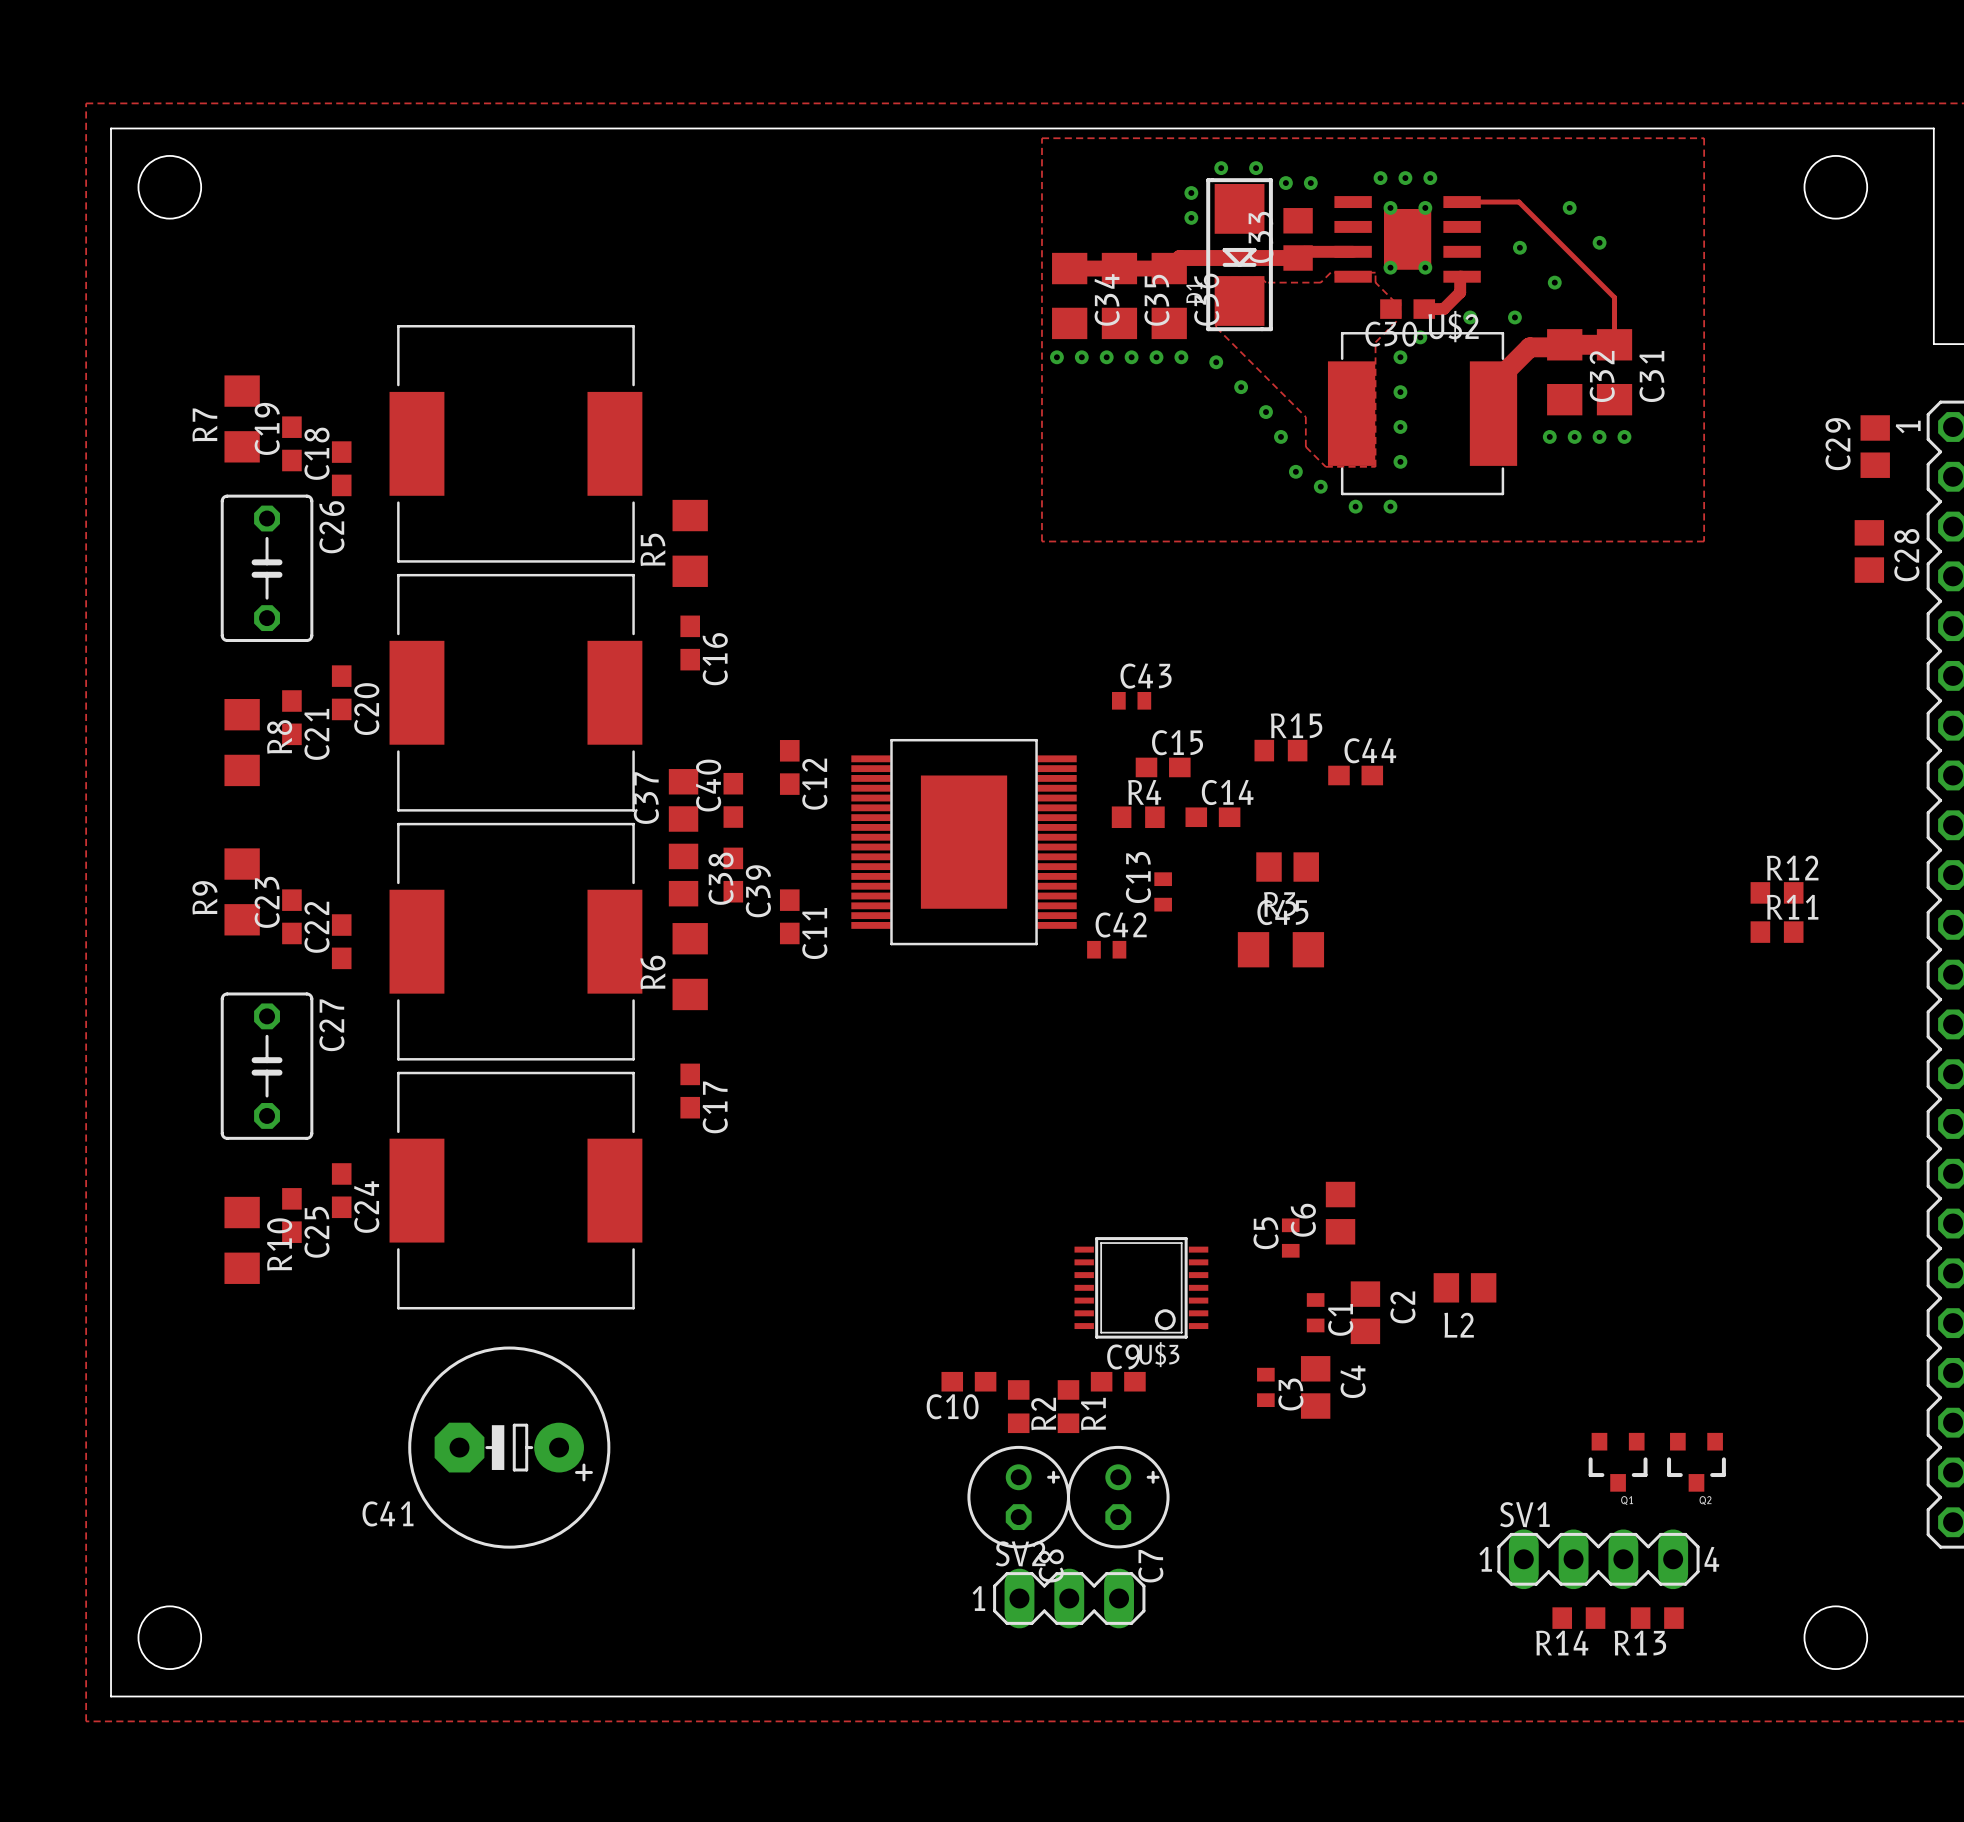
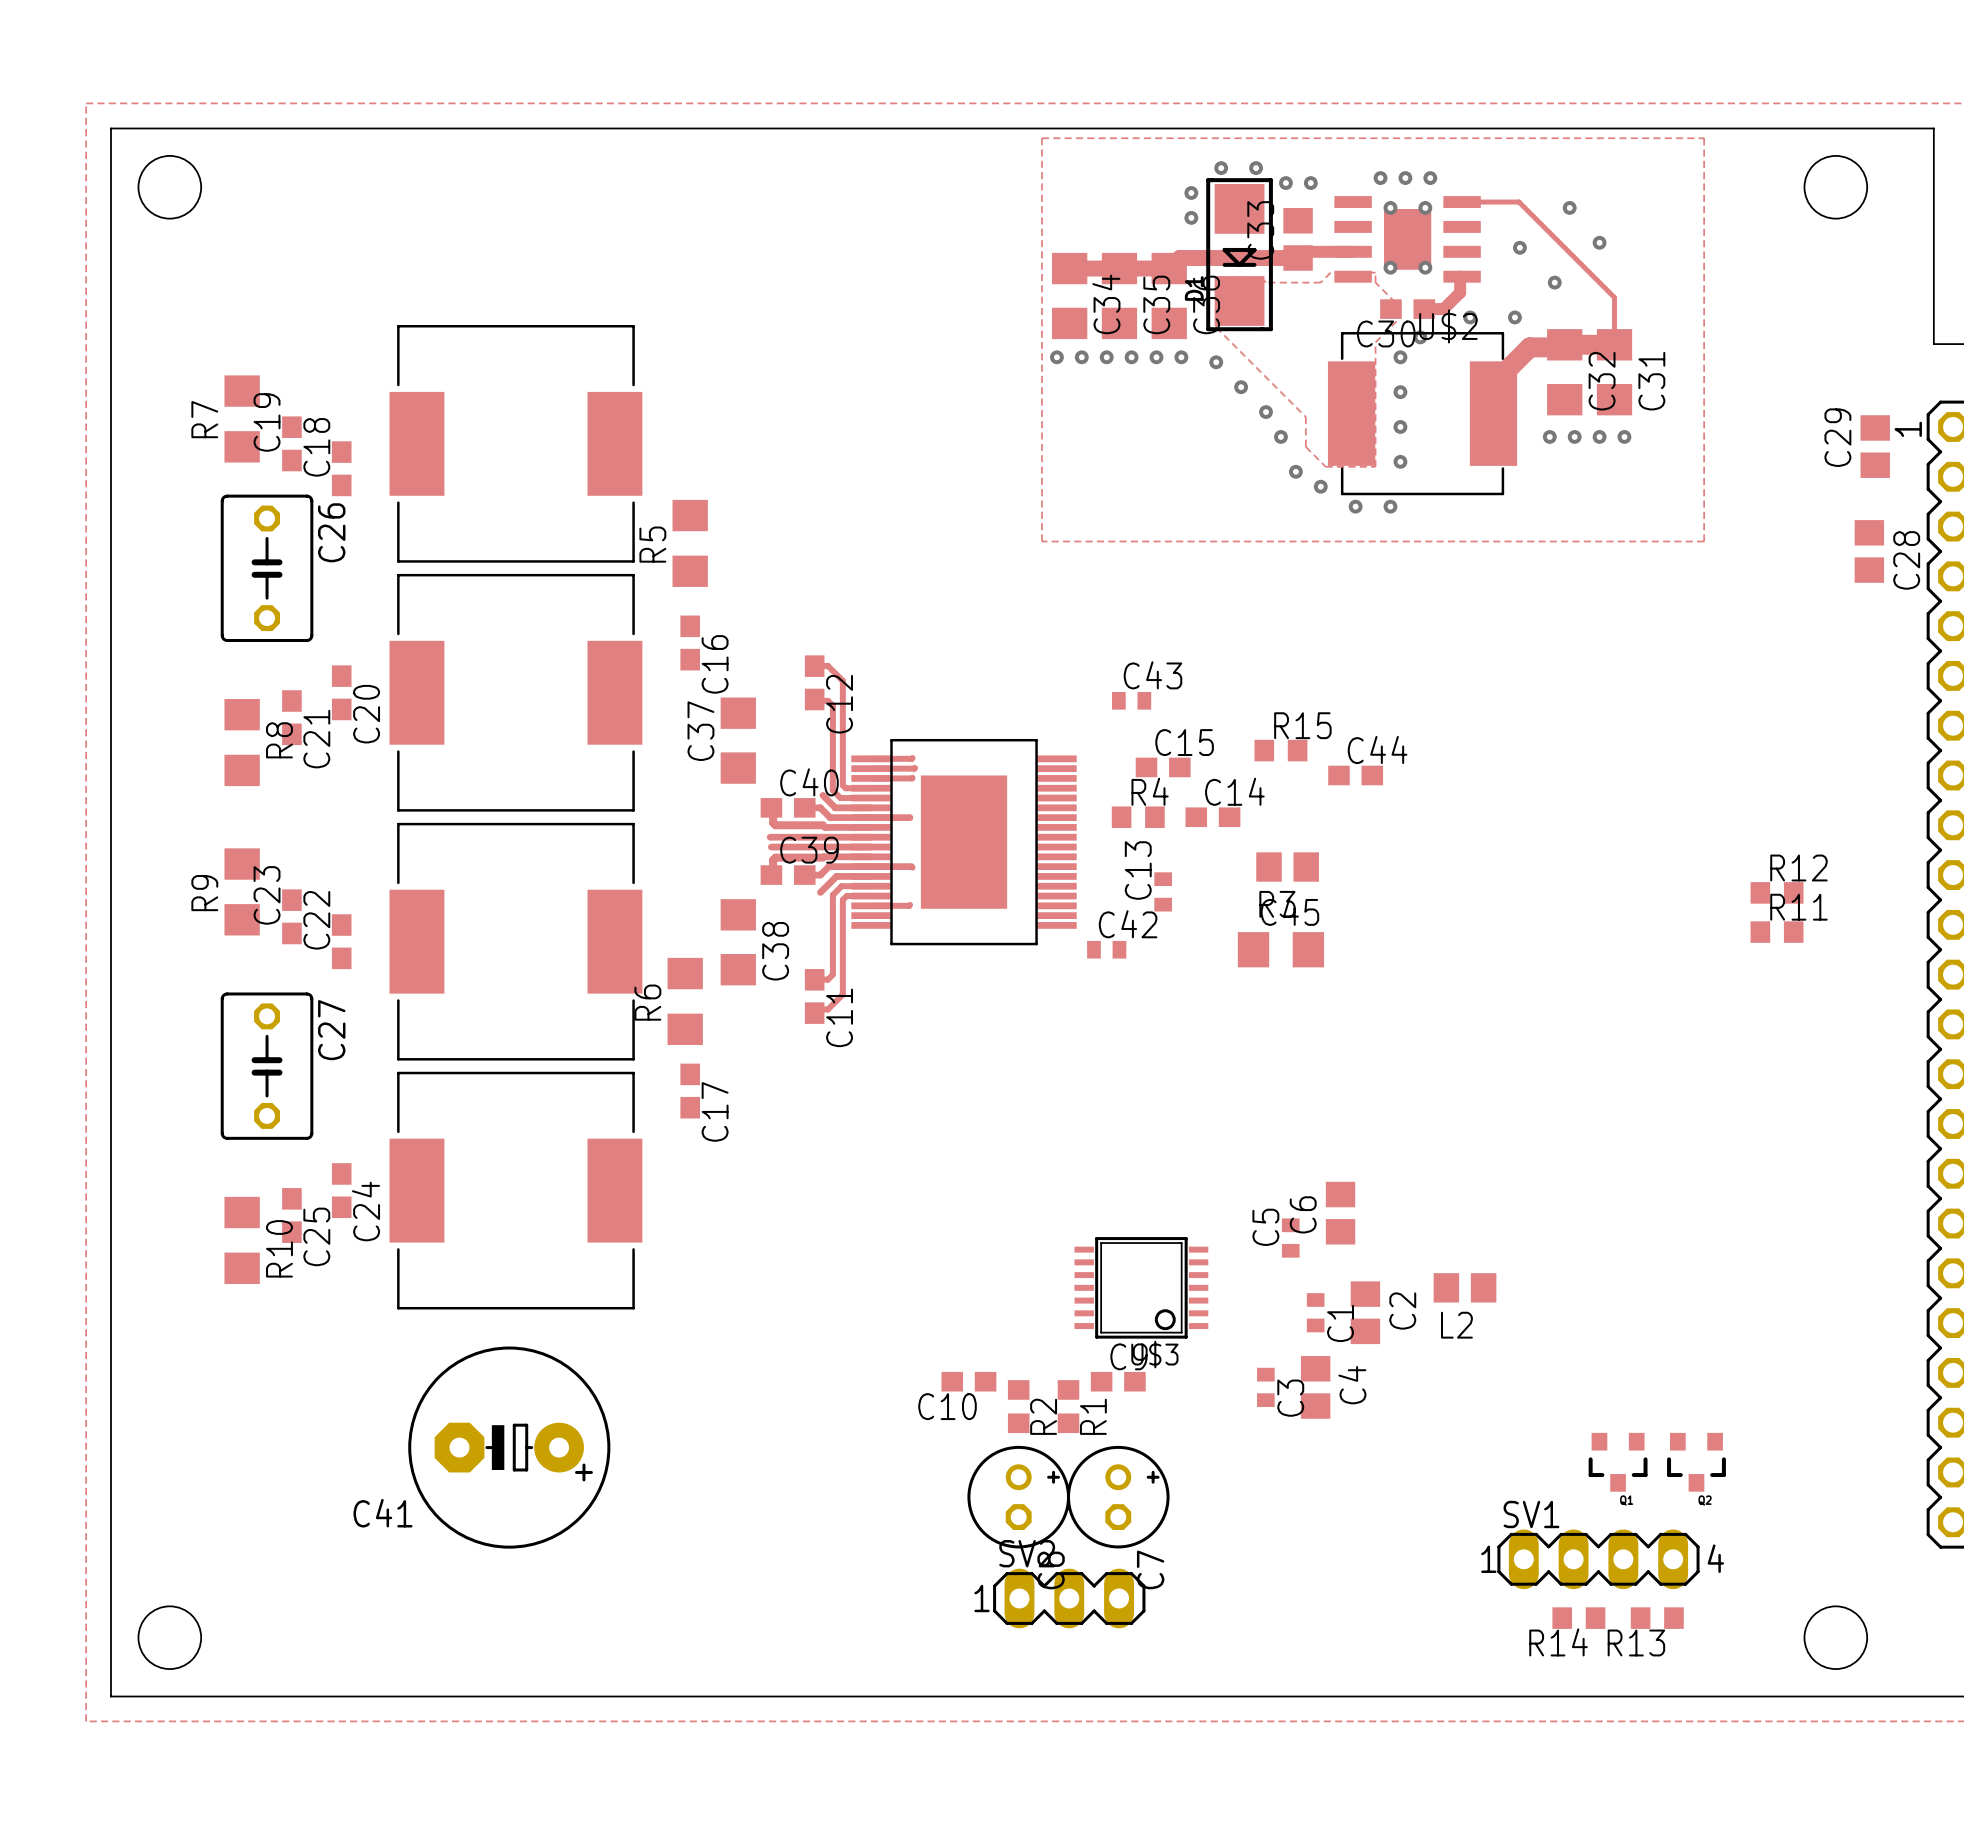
top track: none -> (814, 665) (827, 665) (842, 680) (842, 785) (845, 788) (870, 788)
top track: none -> (814, 699) (827, 700) (832, 705) (832, 790) (840, 798) (870, 798)
top track: none -> (912, 758) (870, 758)
C12 position: (789, 767) -> (814, 682)
top track: none -> (915, 768) (870, 768)
C37 footprint: [668, 769, 699, 832] -> [720, 697, 756, 784]
top track: none -> (912, 777) (870, 778)
top track: none -> (822, 795) (835, 807) (870, 807)
C40 rotation: 0° (733, 800) -> 90° clockwise (788, 807)
C40 position: (733, 800) -> (788, 807)
top track: none -> (771, 807) (773, 809) (773, 822) (775, 825) (870, 827)
top track: none -> (804, 807) (820, 807) (830, 817) (909, 817)
top track: none -> (770, 837) (870, 837)
C38 footprint: [668, 843, 699, 907] -> [720, 899, 756, 986]
top track: none -> (771, 847) (870, 847)
top track: none -> (870, 856) (775, 857) (773, 860) (773, 873) (771, 875)
top track: none -> (912, 867) (828, 866) (820, 875) (804, 875)
C39 rotation: 0° (733, 875) -> 90° clockwise (788, 875)
C39 position: (733, 875) -> (788, 875)
top track: none -> (870, 876) (836, 876) (820, 892)
top track: none -> (870, 886) (841, 886) (832, 894) (832, 974) (827, 979) (814, 979)
C39 name position: C39 (758, 891) -> C39 (809, 850)
top track: none -> (870, 896) (846, 896) (842, 899) (842, 994) (827, 1009) (818, 1009) (814, 1013)
top track: none -> (910, 904) (870, 905)
C11 position: (789, 916) -> (814, 996)
R6 position: (690, 966) -> (685, 1001)

